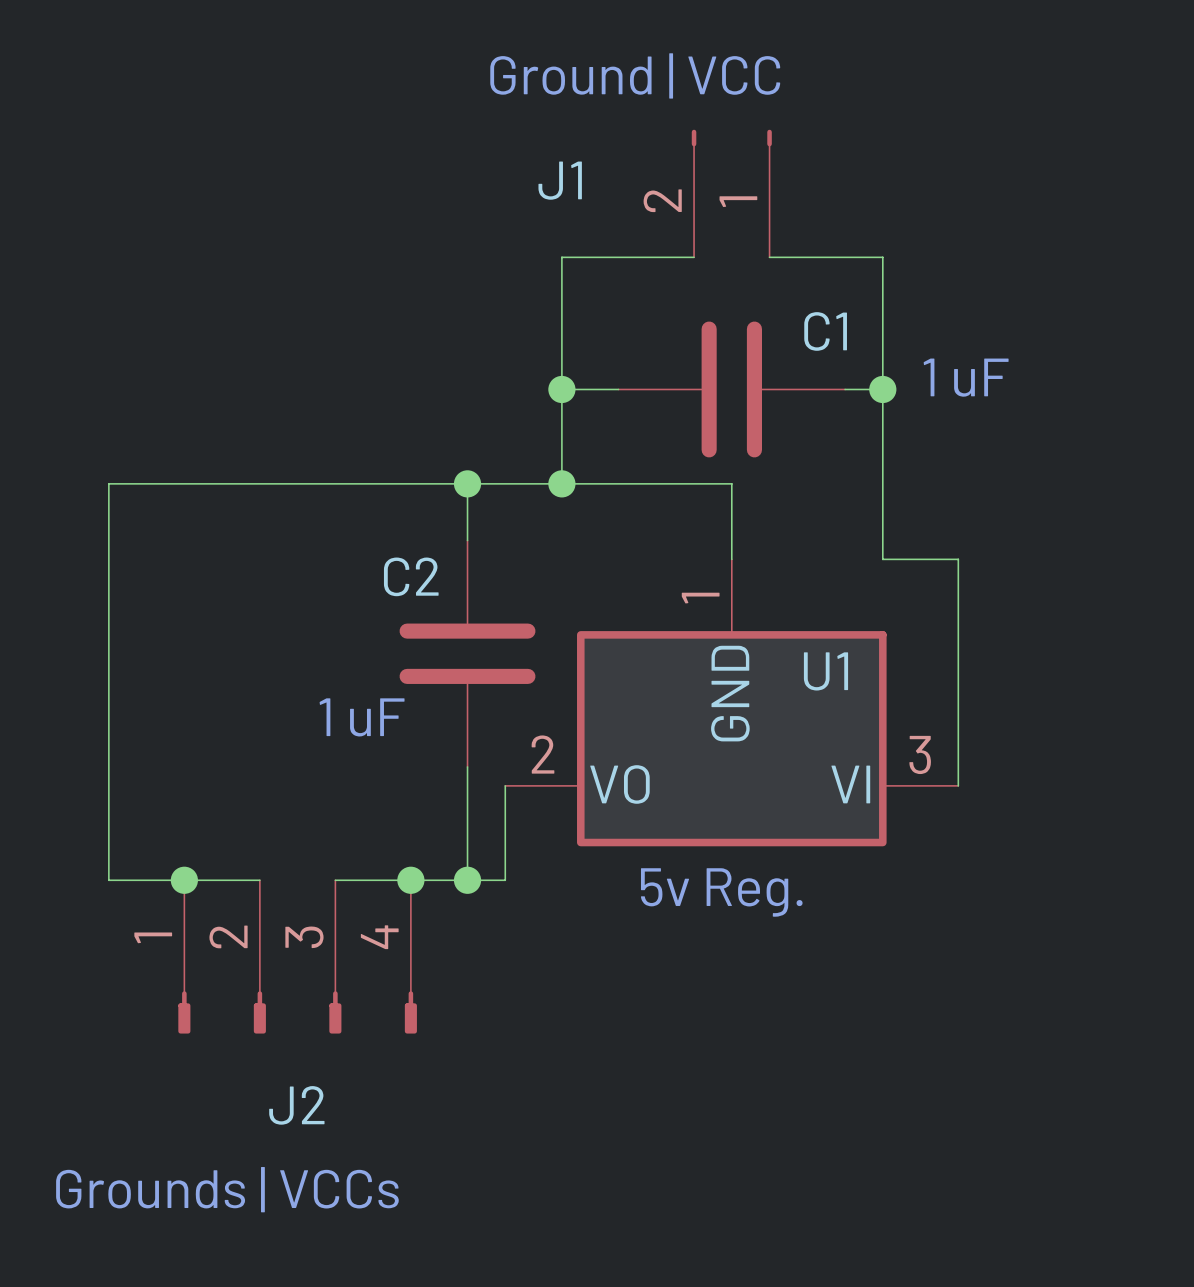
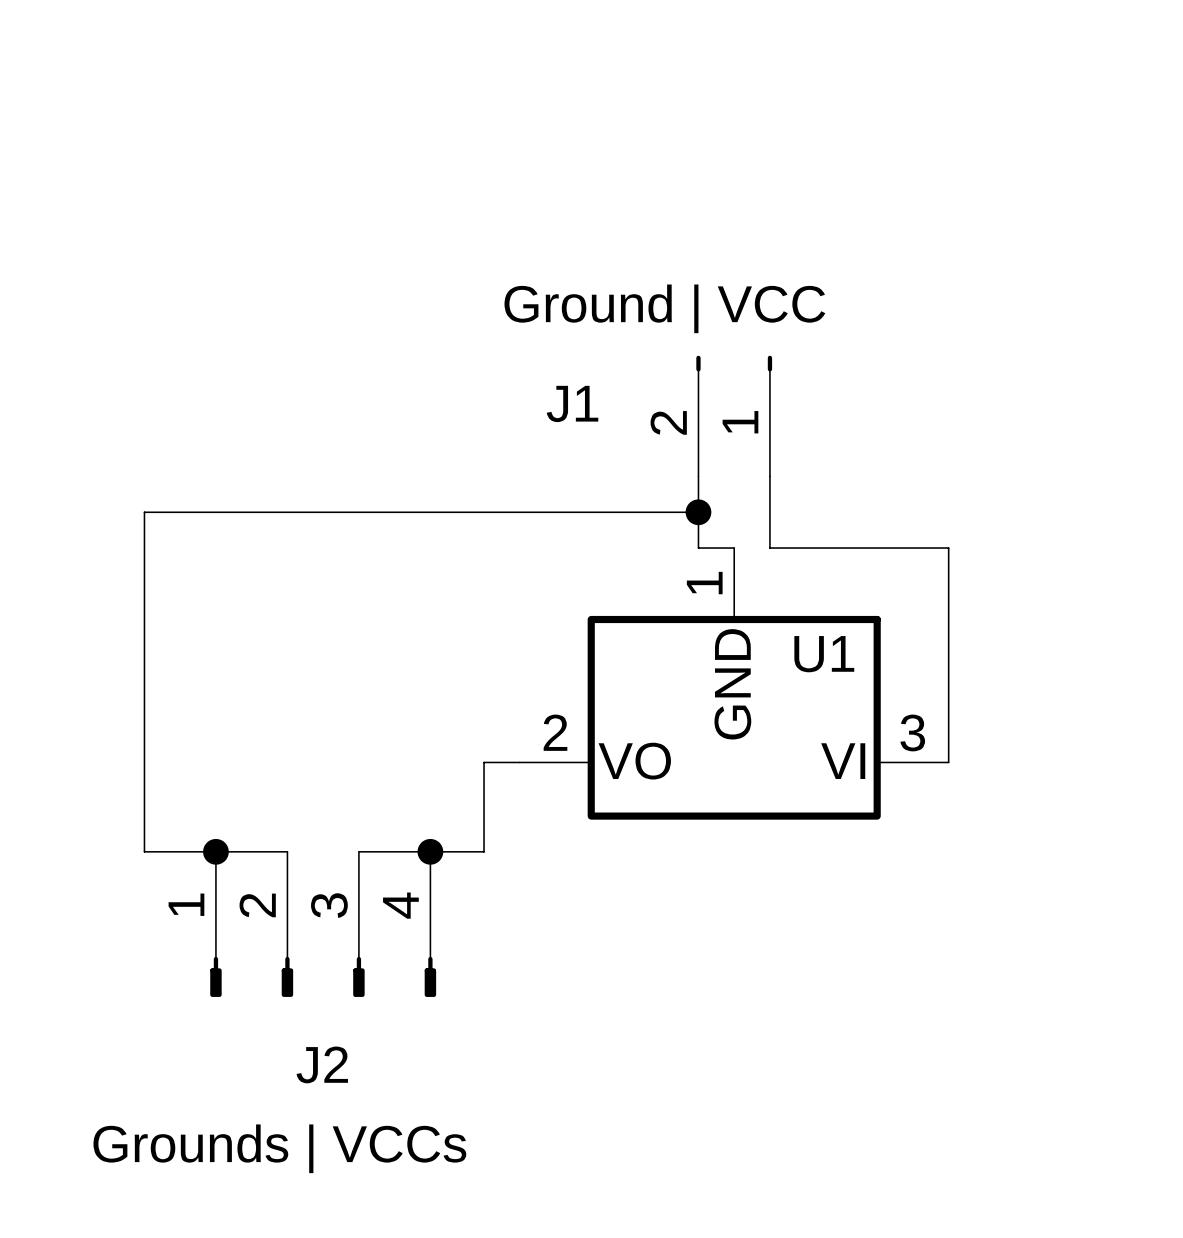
text position: Ground | VCC (635, 75) -> Ground | VCC (664, 308)
J1 position: (731, 193) -> (734, 416)
wire: (694, 257) (561, 257) (561, 483) -> none
wire: (769, 257) (882, 257) (882, 559) -> (769, 476) (769, 548) (877, 548)
text: 1 uF (966, 377) -> none
wire: (561, 389) (618, 389) -> none
junction: (561, 389) -> none
C1: (731, 389) -> none
wire: (845, 389) (882, 389) -> none
junction: (882, 389) -> none
wire: (467, 483) (467, 540) -> none
junction: (467, 483) -> none
junction: (561, 483) -> none
wire: none -> (698, 476) (698, 548) (734, 548)
wire: (108, 521) (108, 483) (731, 483) (731, 559) -> (144, 512) (698, 512)
junction: none -> (698, 512)
C2: (467, 653) -> none
text: 1 uF (362, 717) -> none
wire: (467, 767) (467, 785) -> (519, 762) (484, 762)
wire: (505, 785) (505, 880) (467, 880) -> none
junction: (467, 880) -> none
text: 5v Reg. (721, 892) -> none

